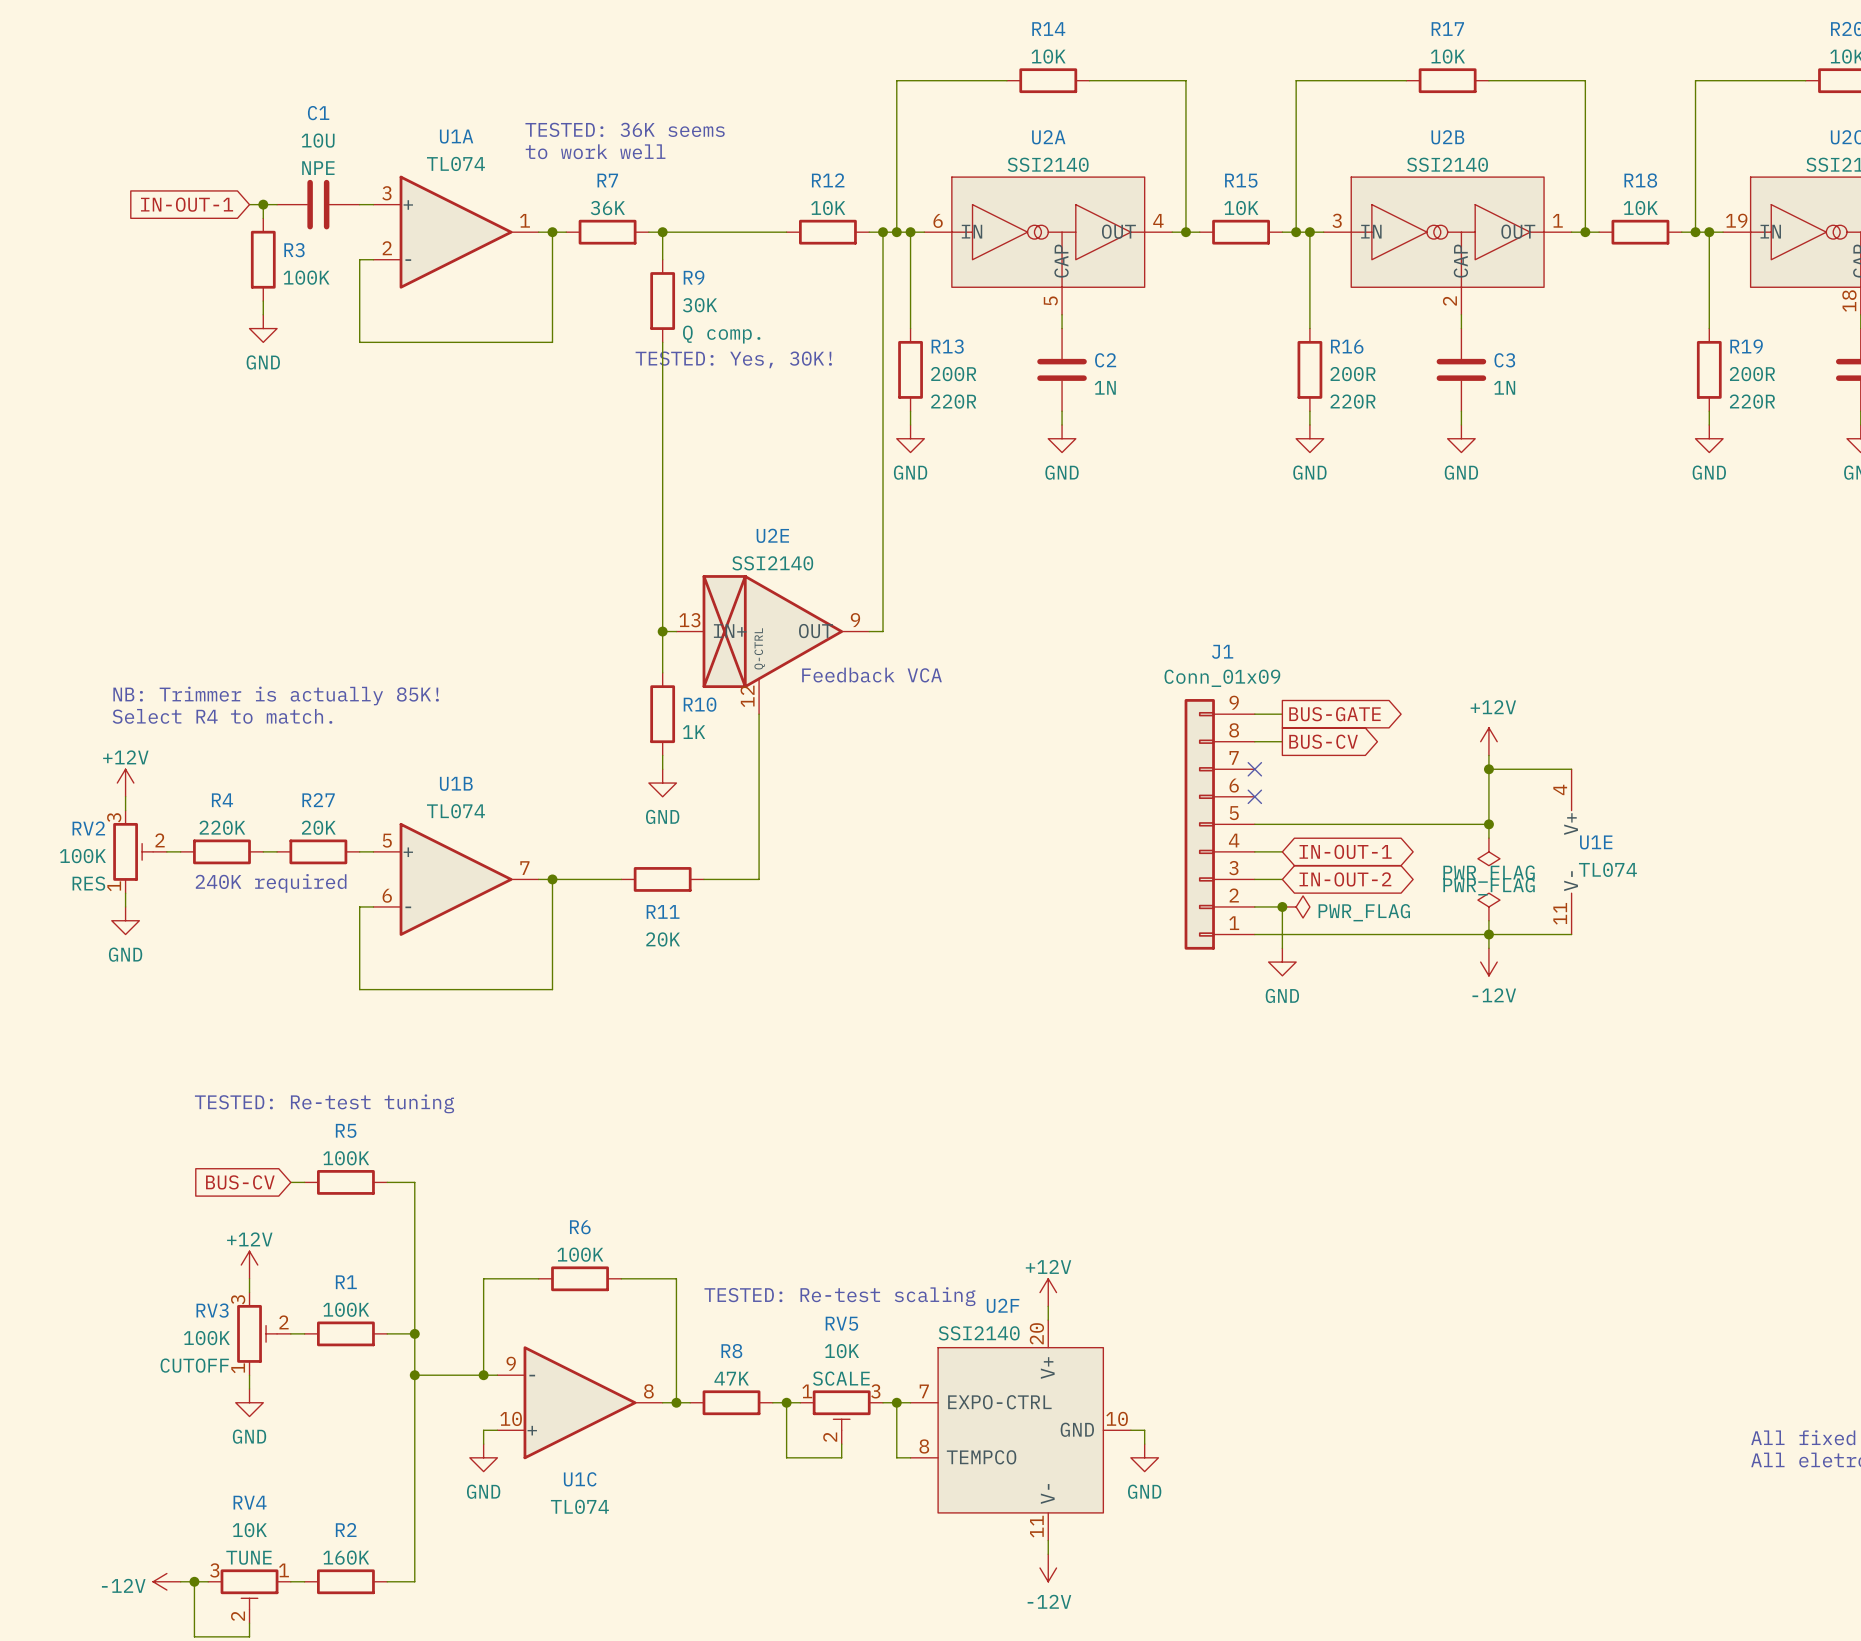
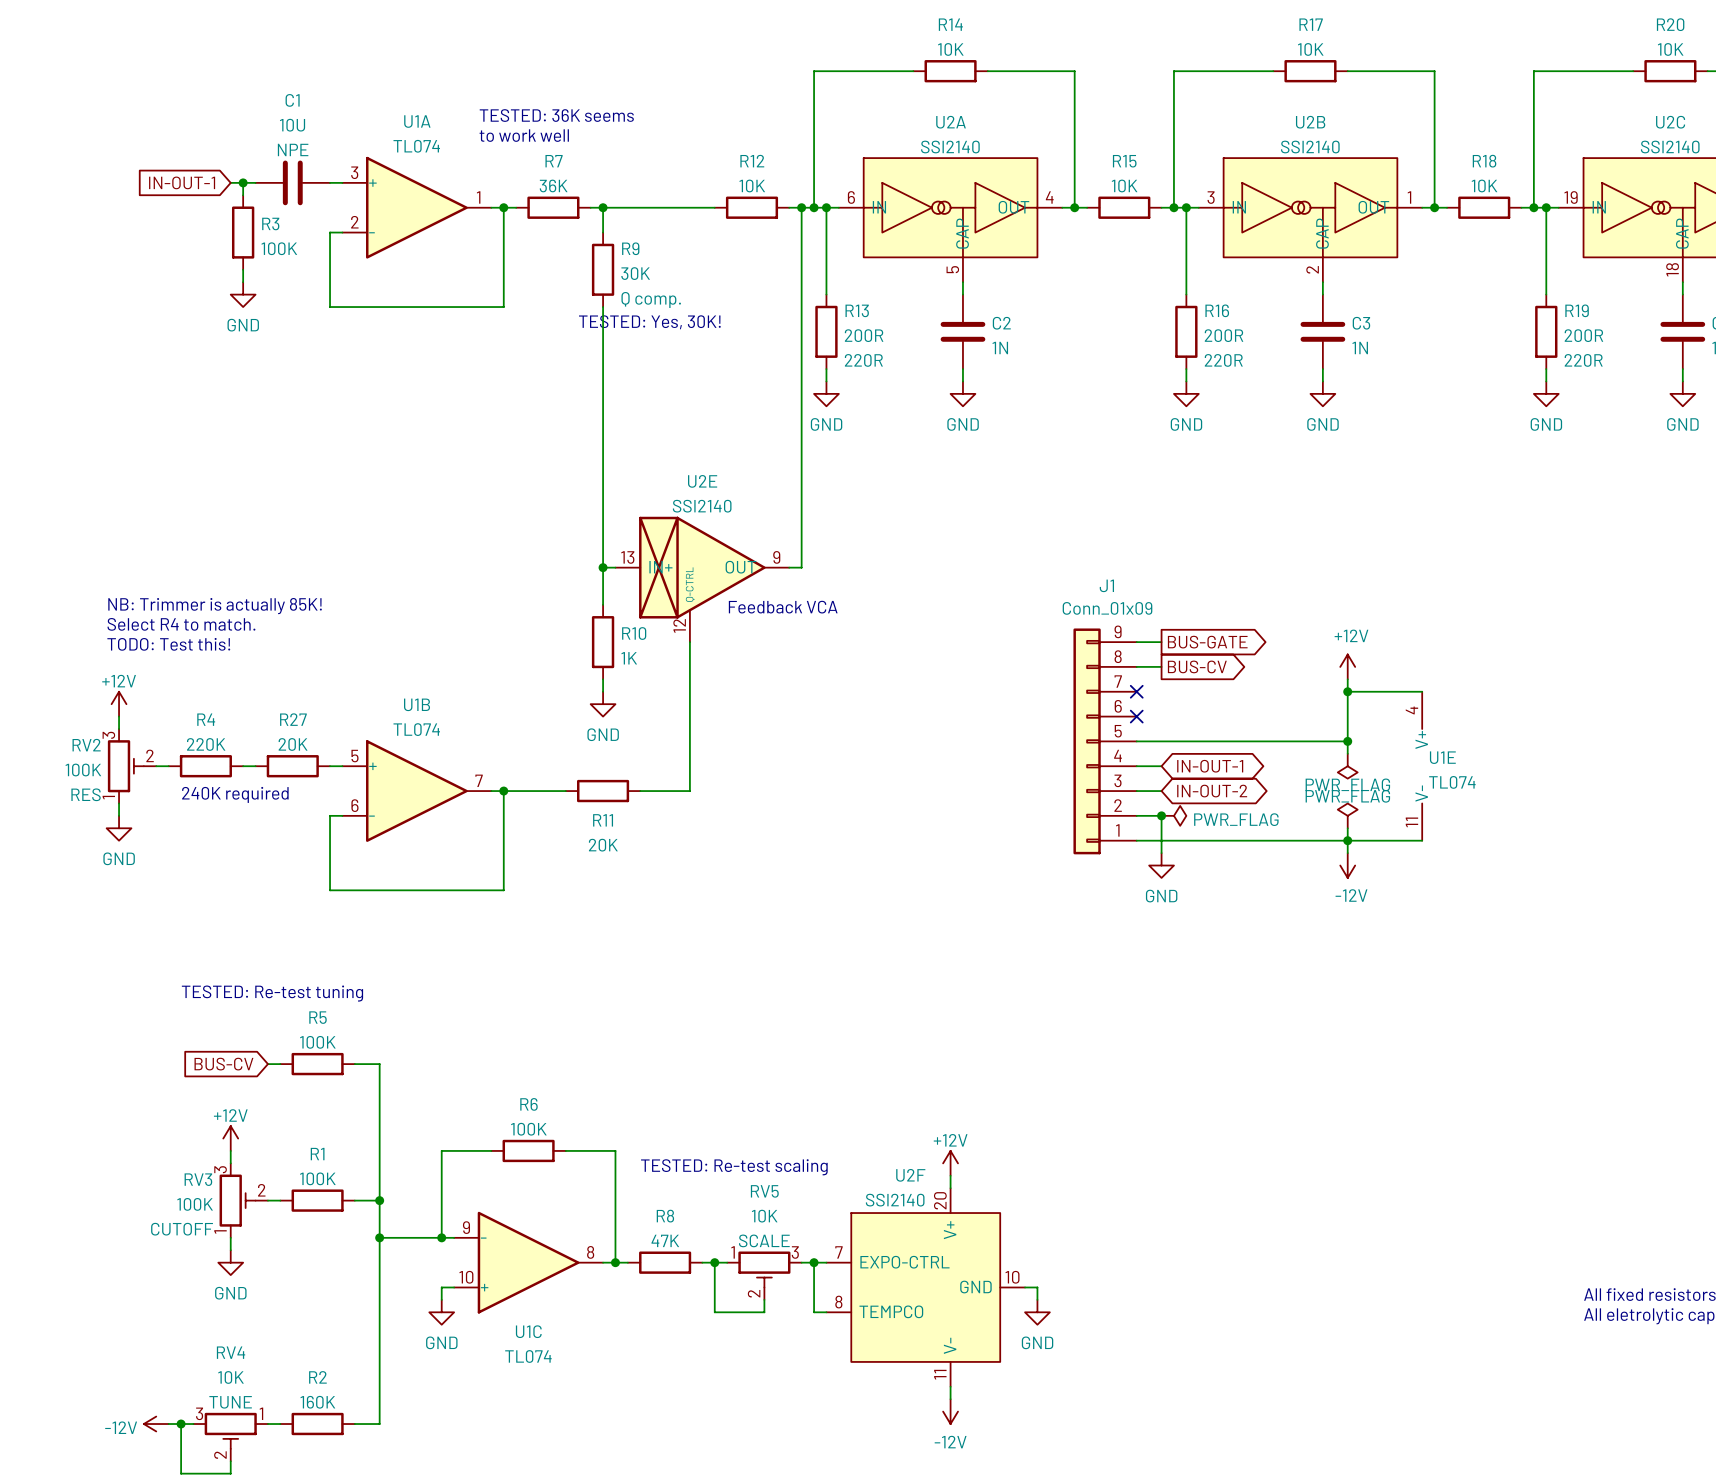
text: none -> NB: Trimmer is actually 85K! (215, 606)
text: NB: Trimmer is actually 85K! (276, 695) -> Select R4 to match. (181, 624)
text: Select R4 to match. (222, 716) -> TODO: Test this! (168, 644)

